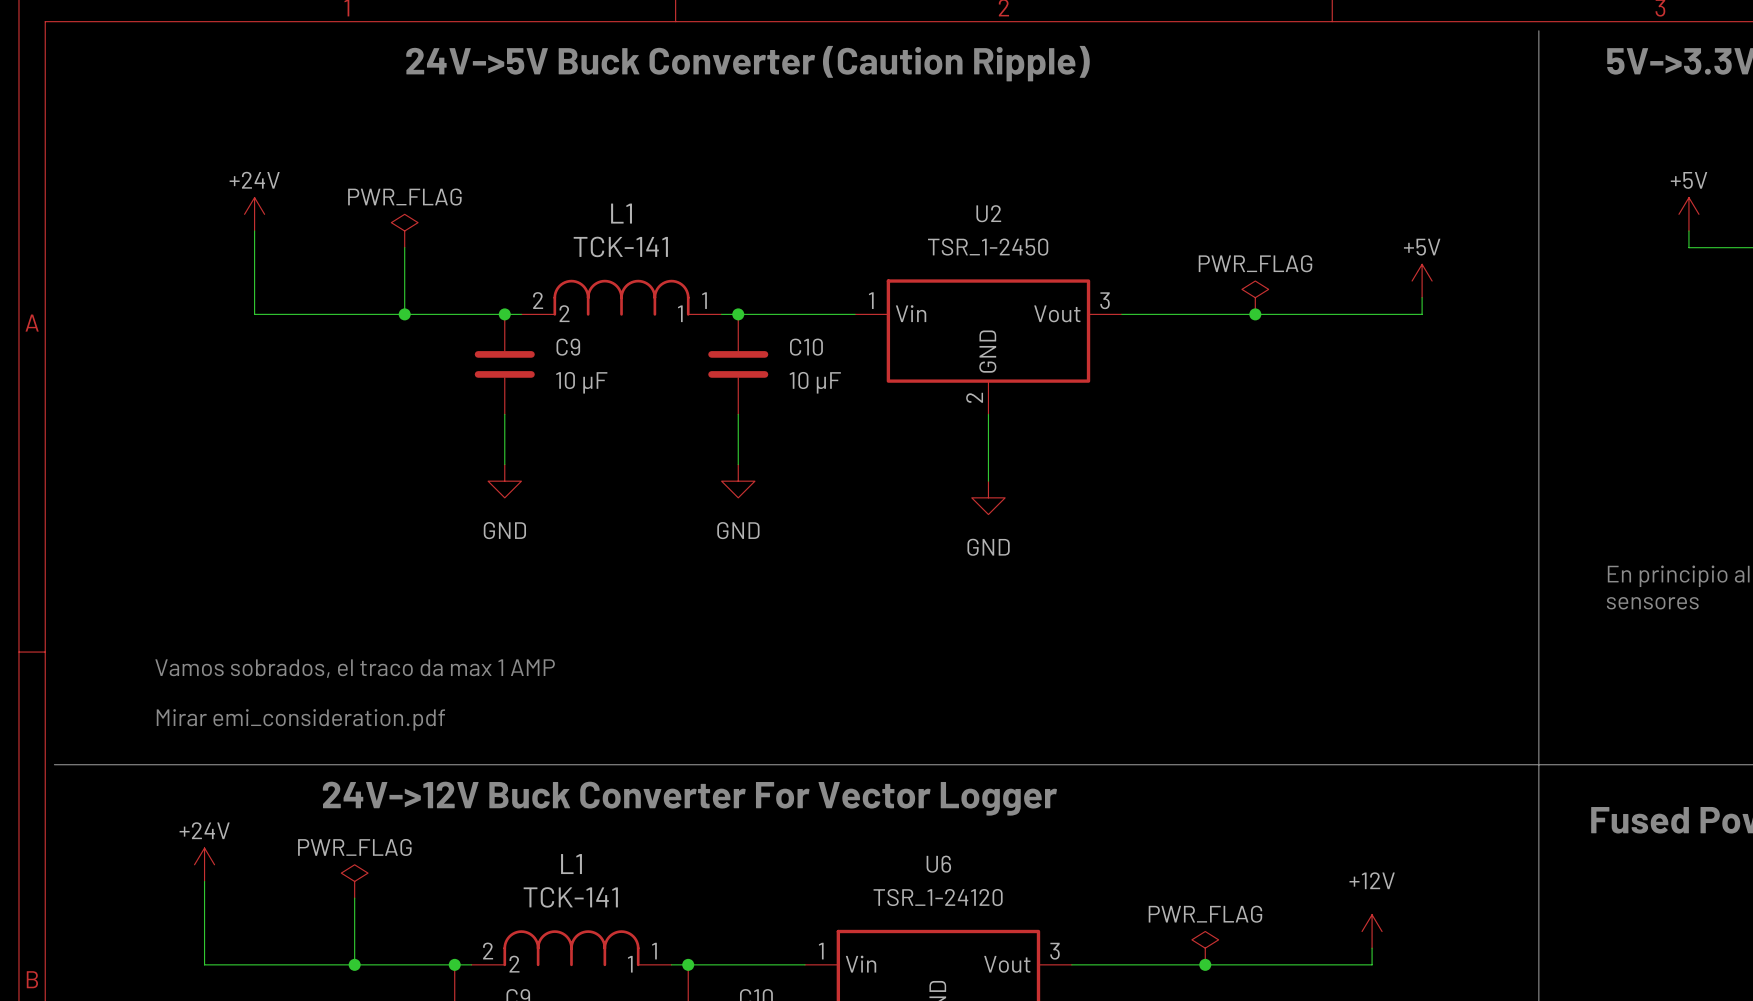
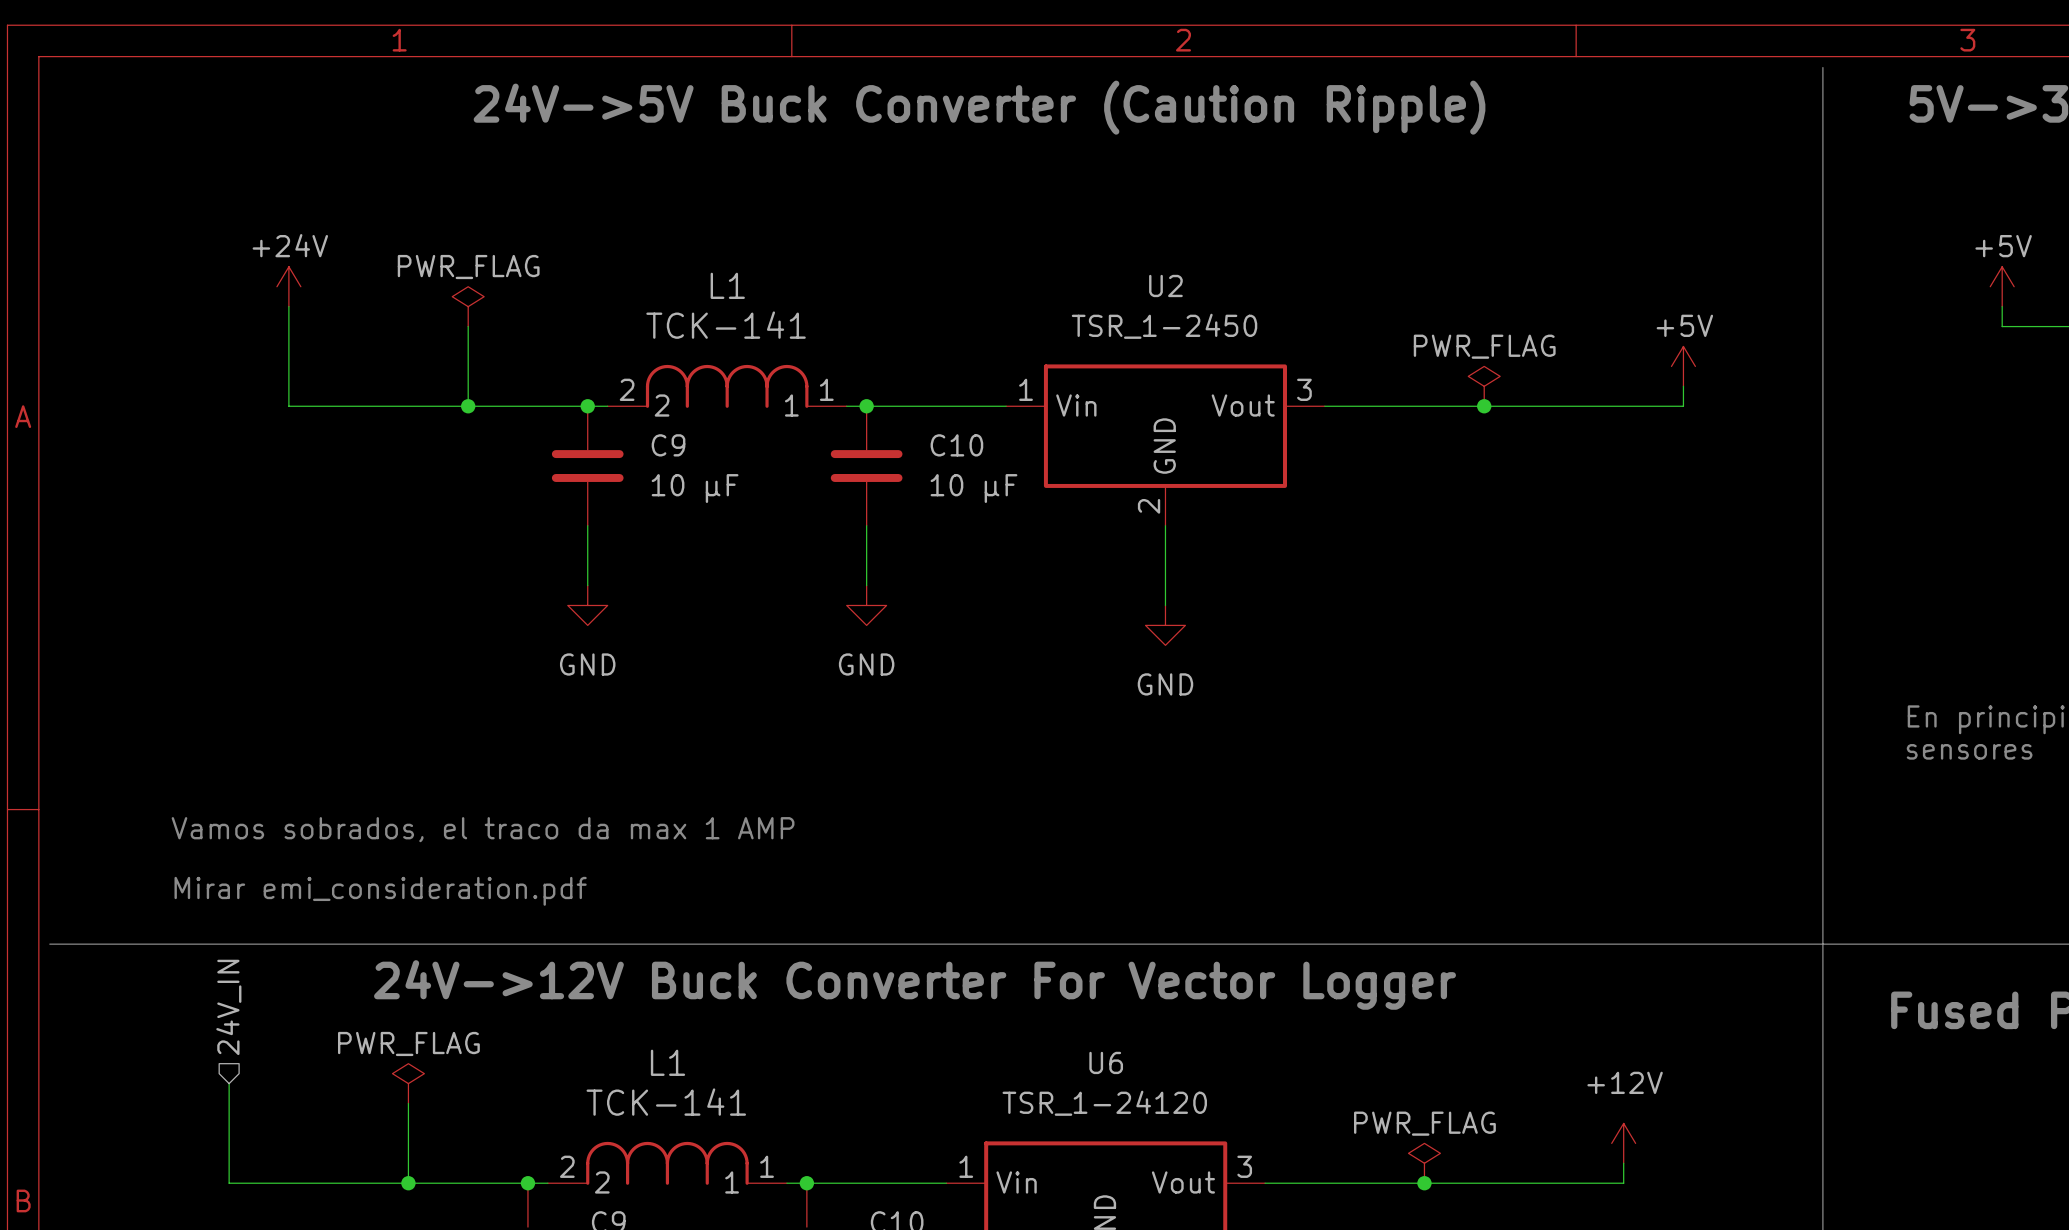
hierarchical label: none -> 24V_IN (228, 1007)
power symbol: +24V (204, 864) -> none

